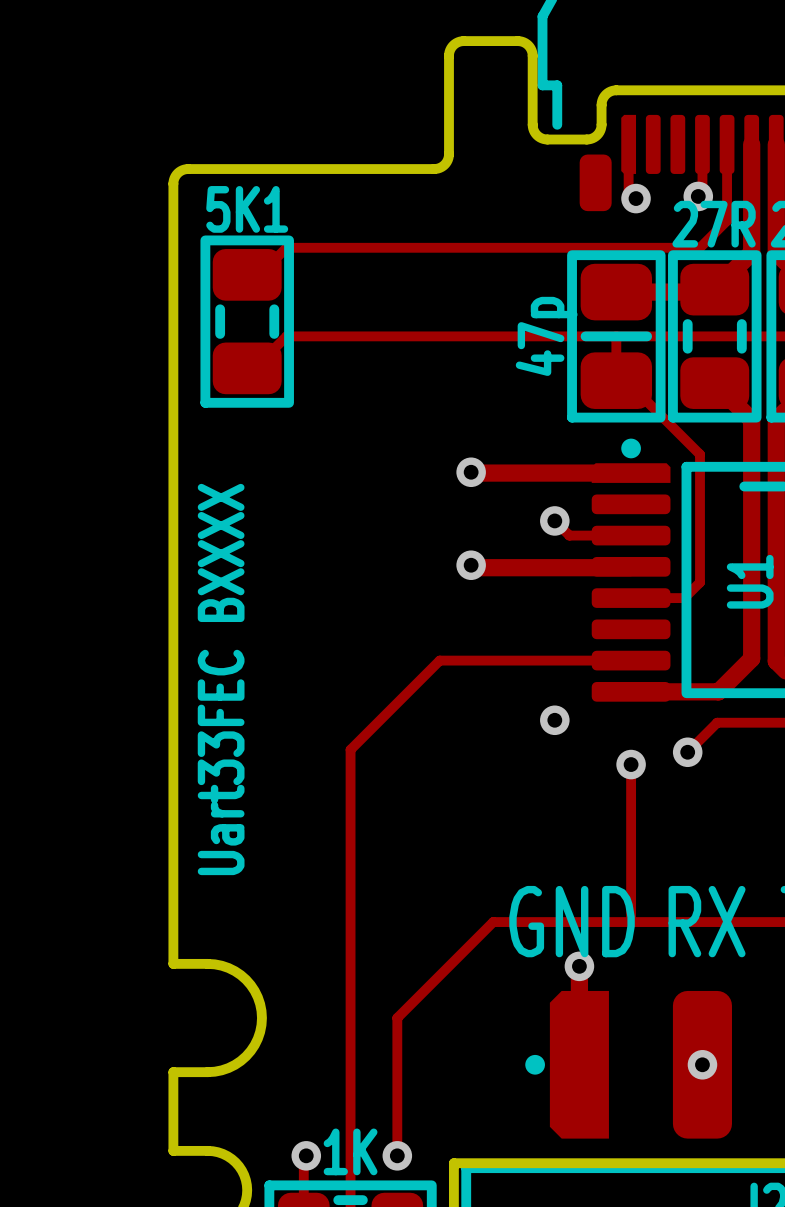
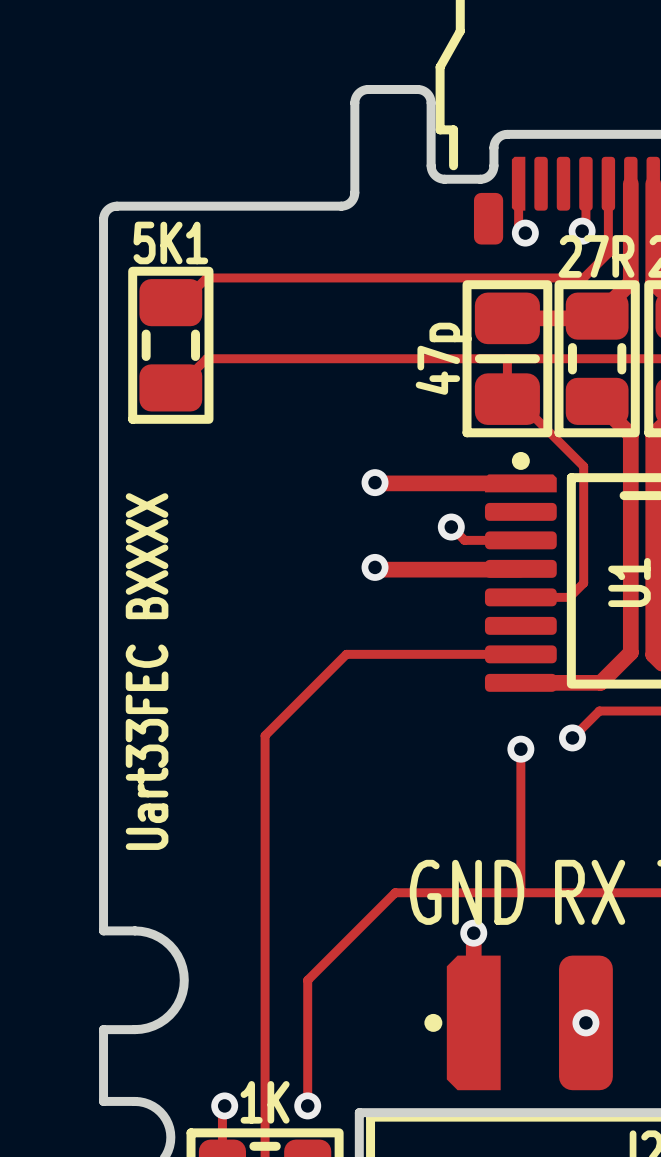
via: (554, 720) -> none

